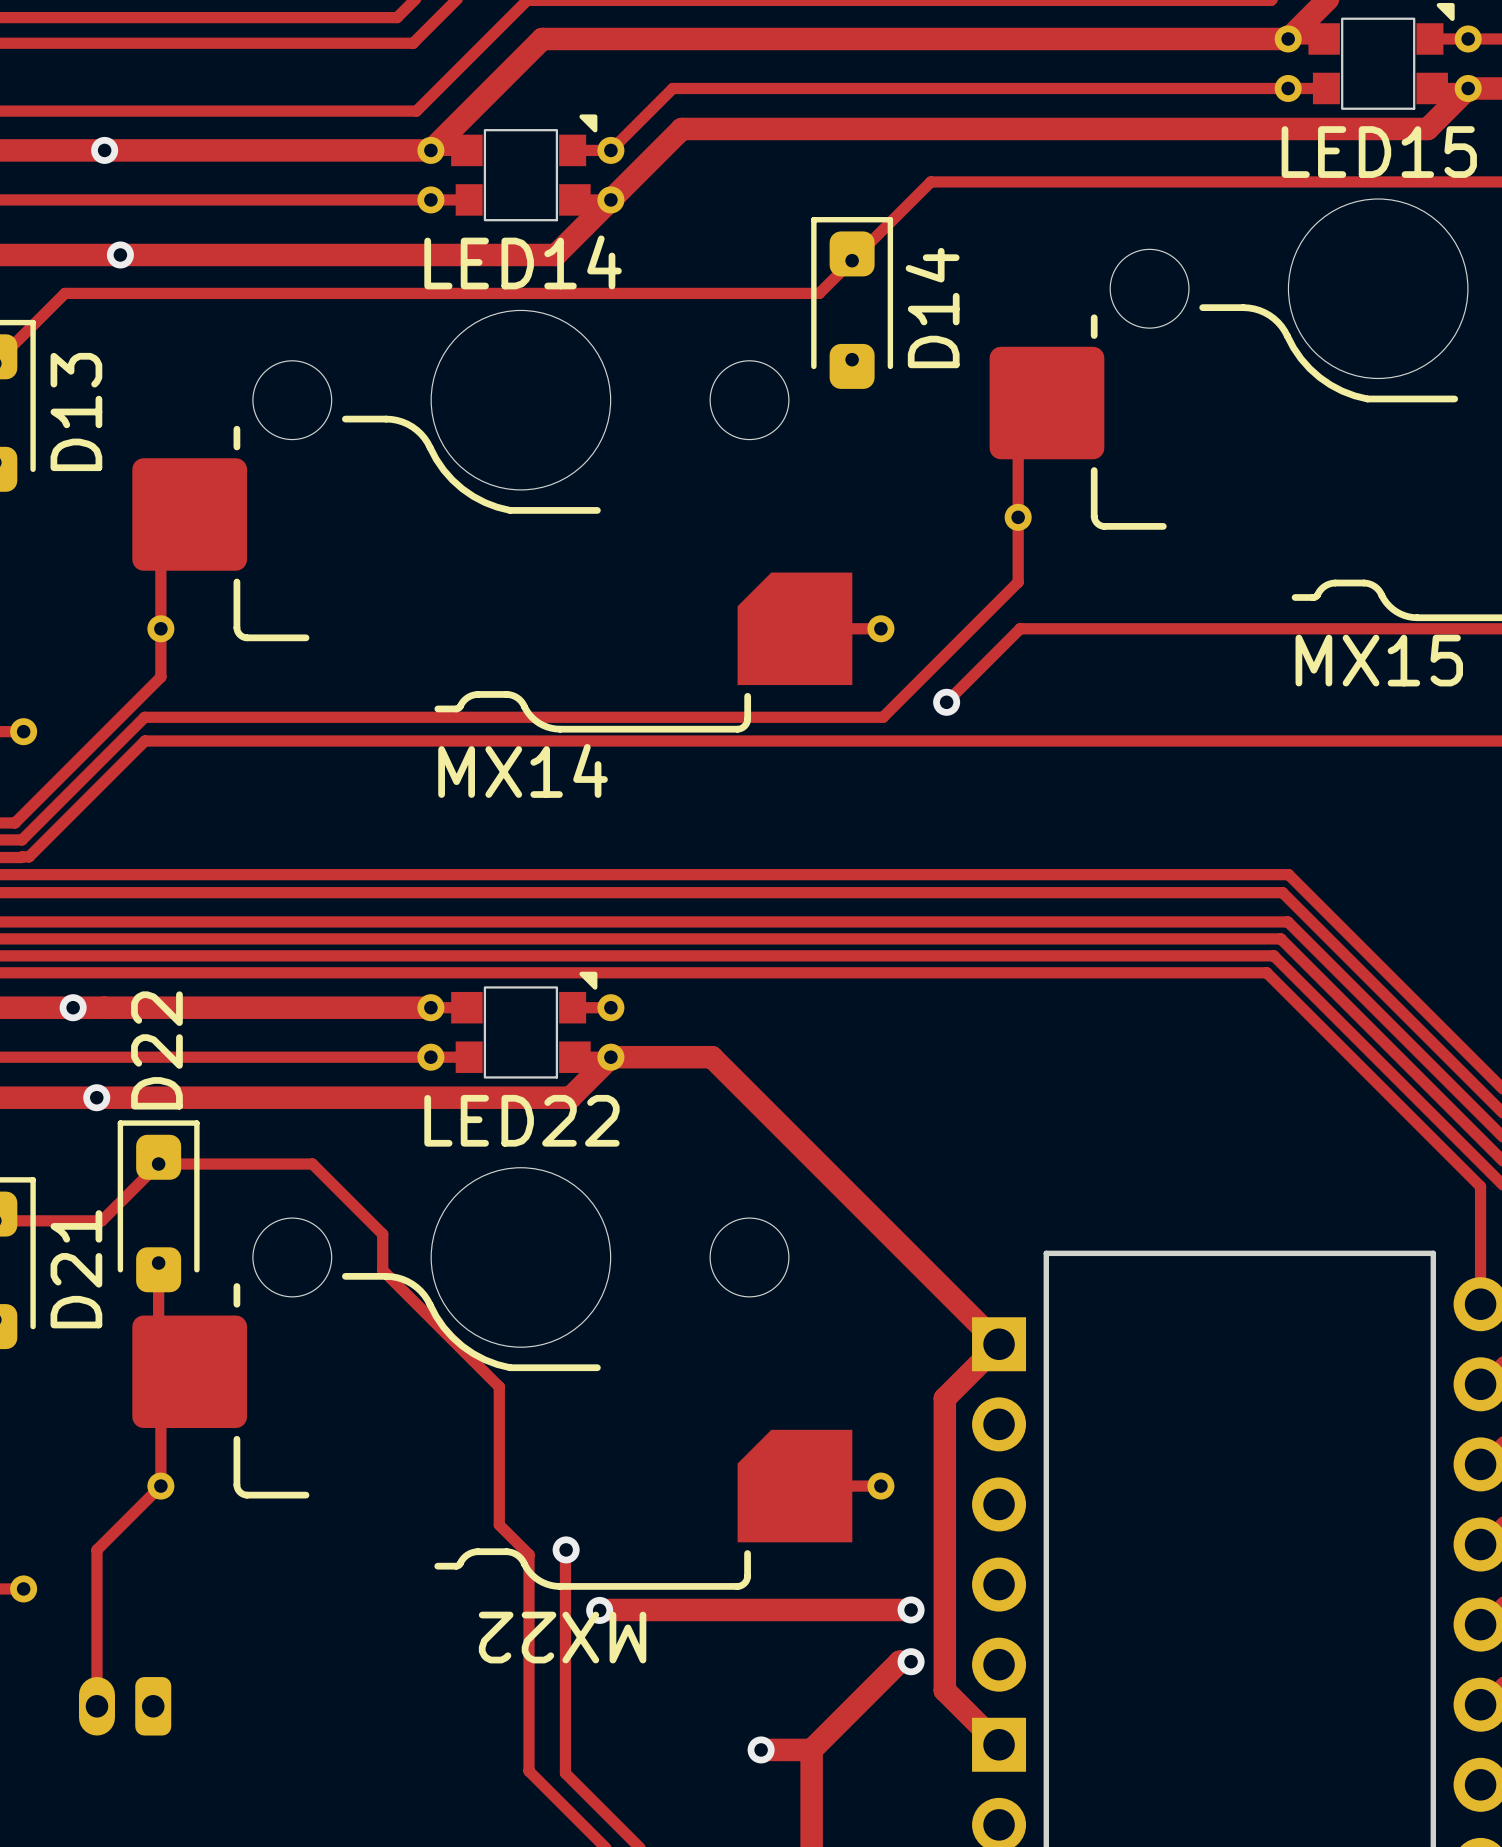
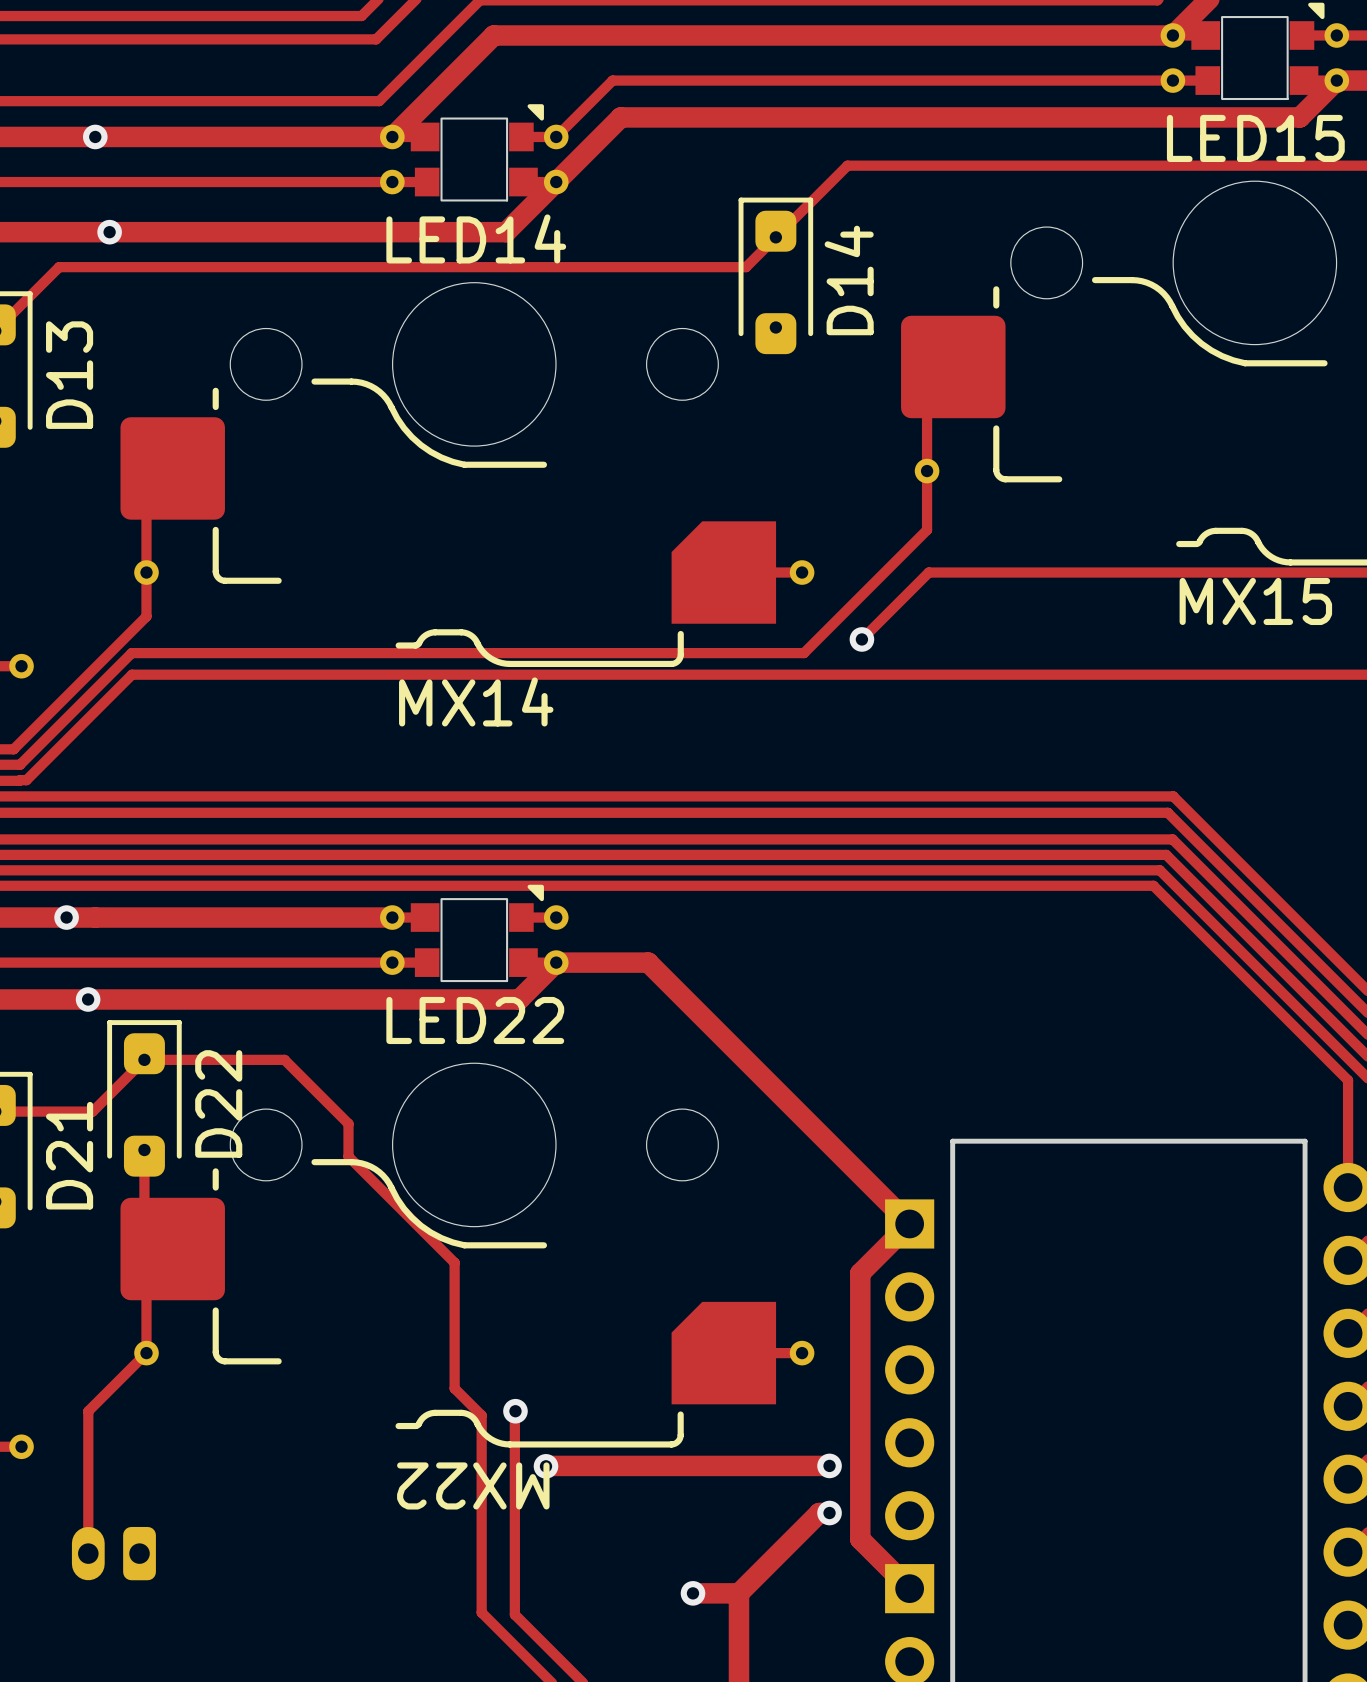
D22 name position: D22 (156, 1050) -> D22 (218, 1103)
MX22 name position: MX22 (562, 1637) -> MX22 (473, 1485)

